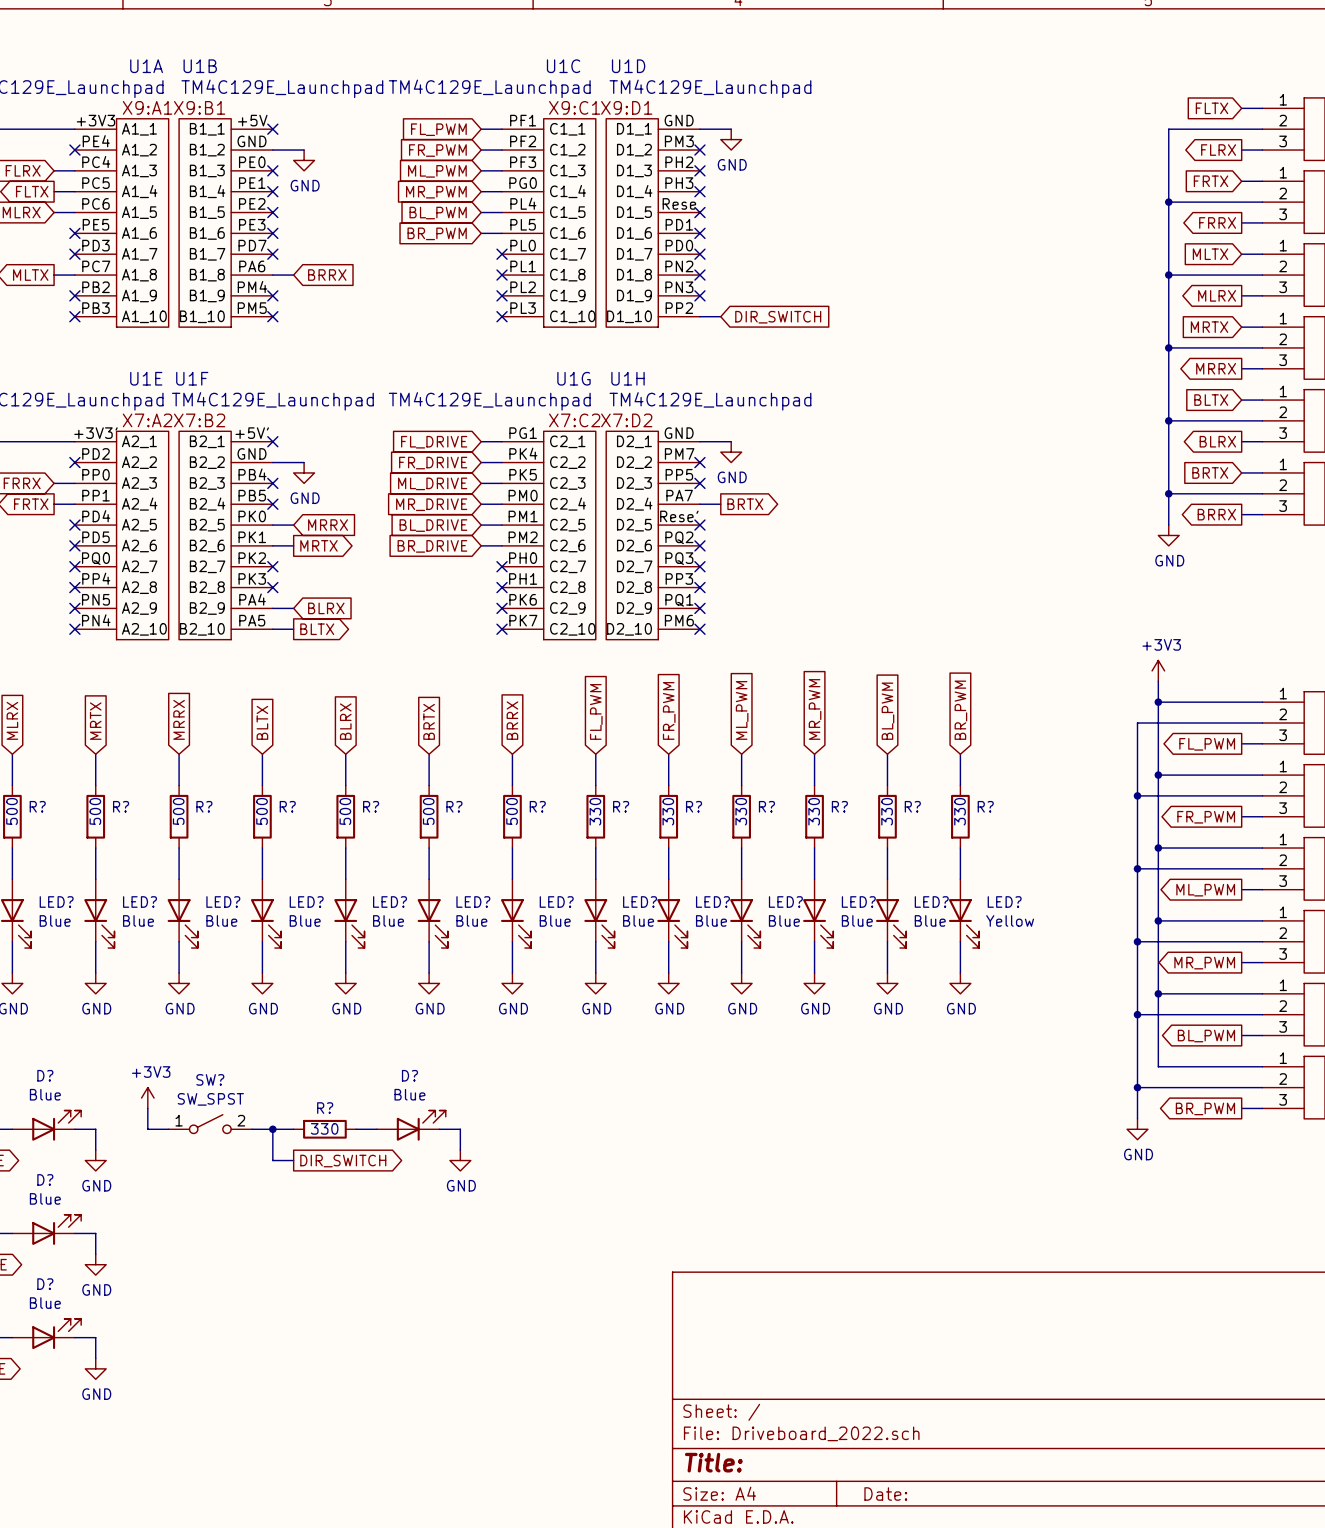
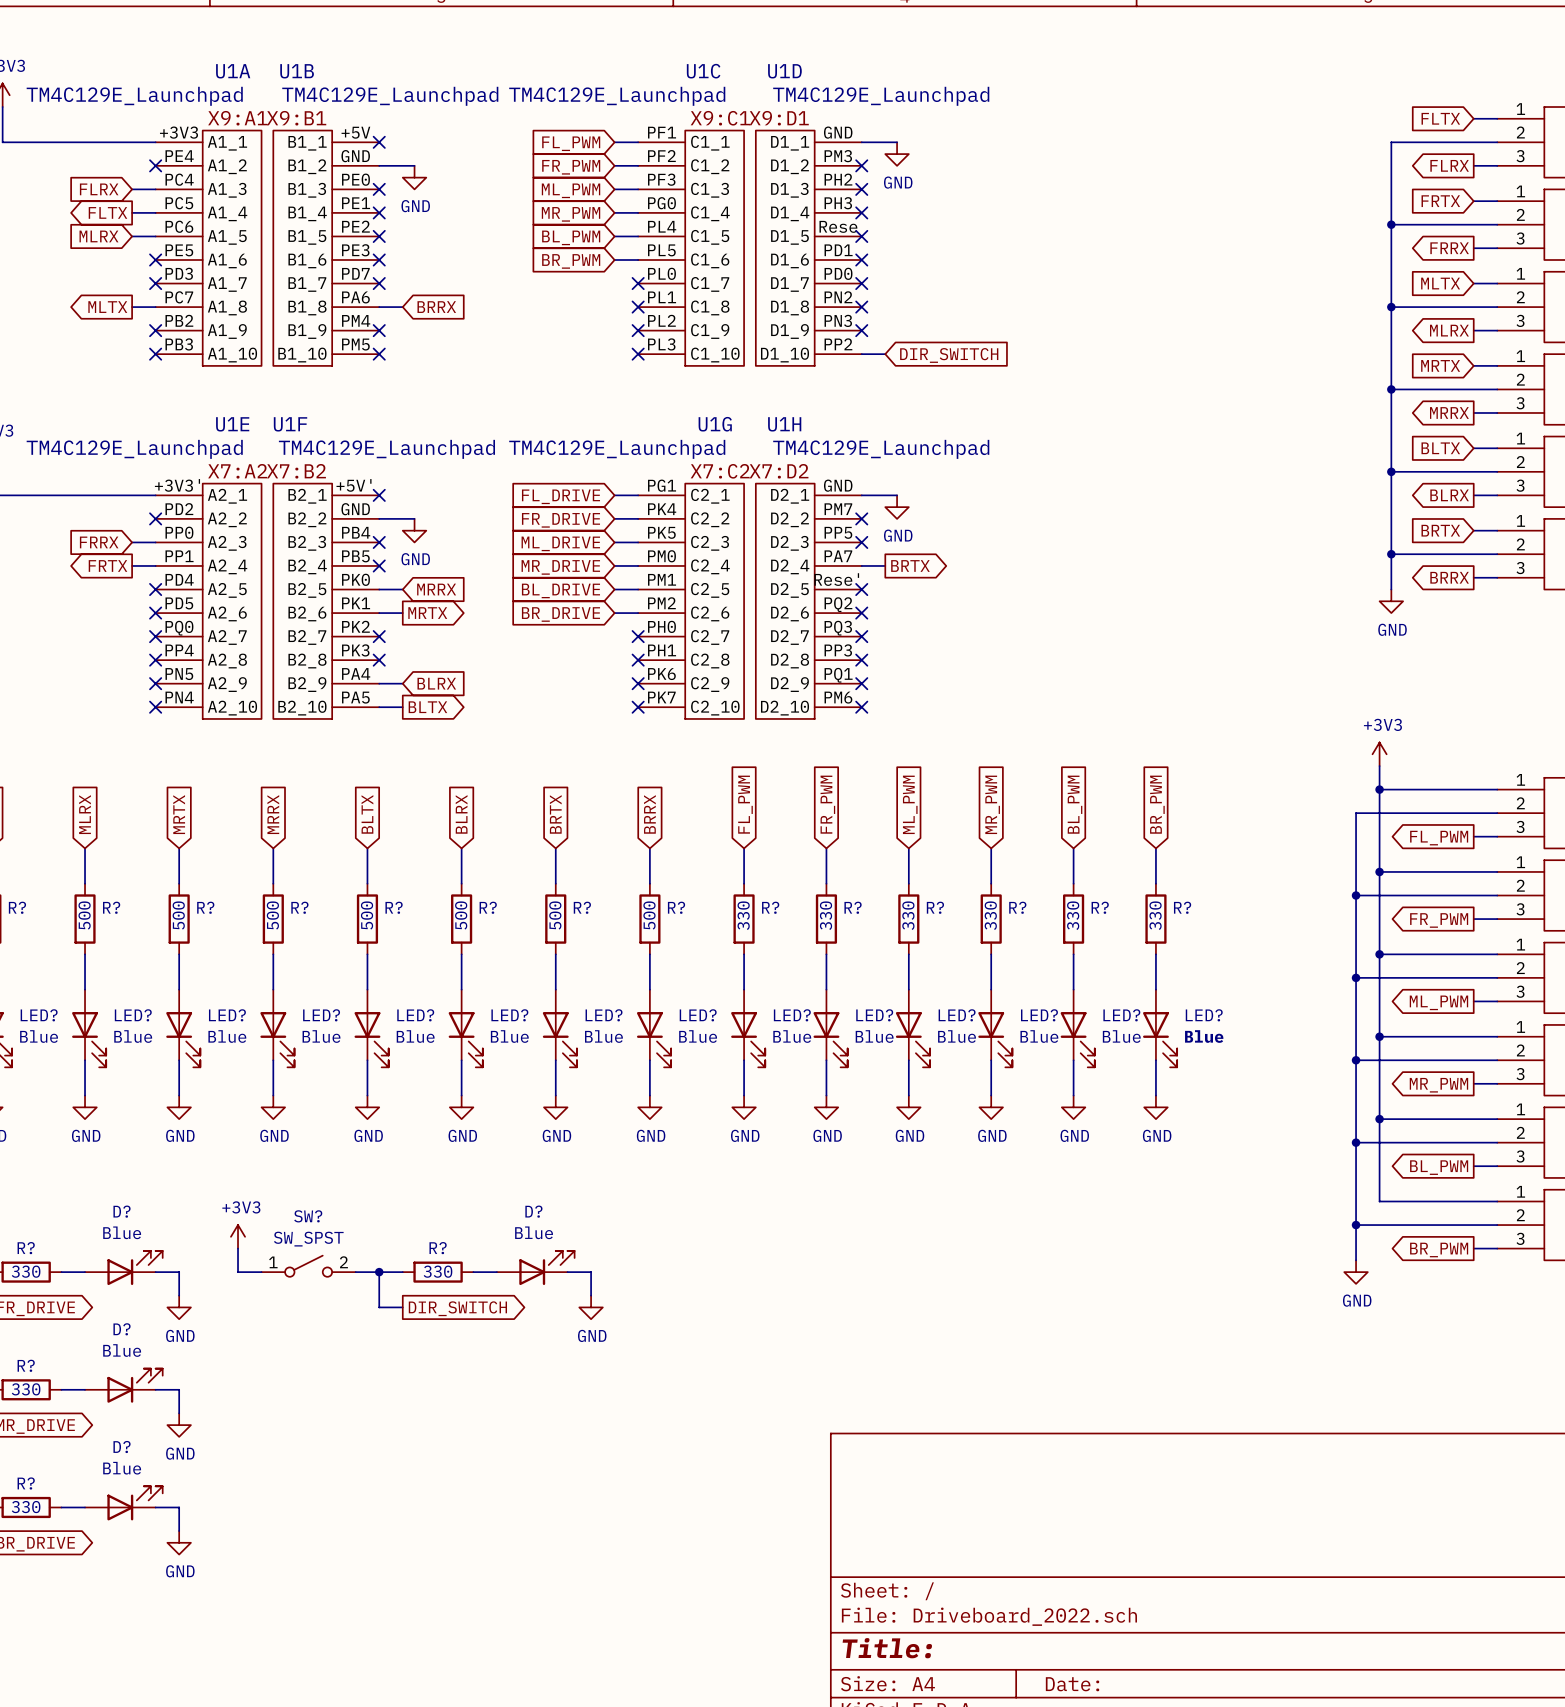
LED? value: Yellow (1010, 920) -> Blue (1204, 1036)

